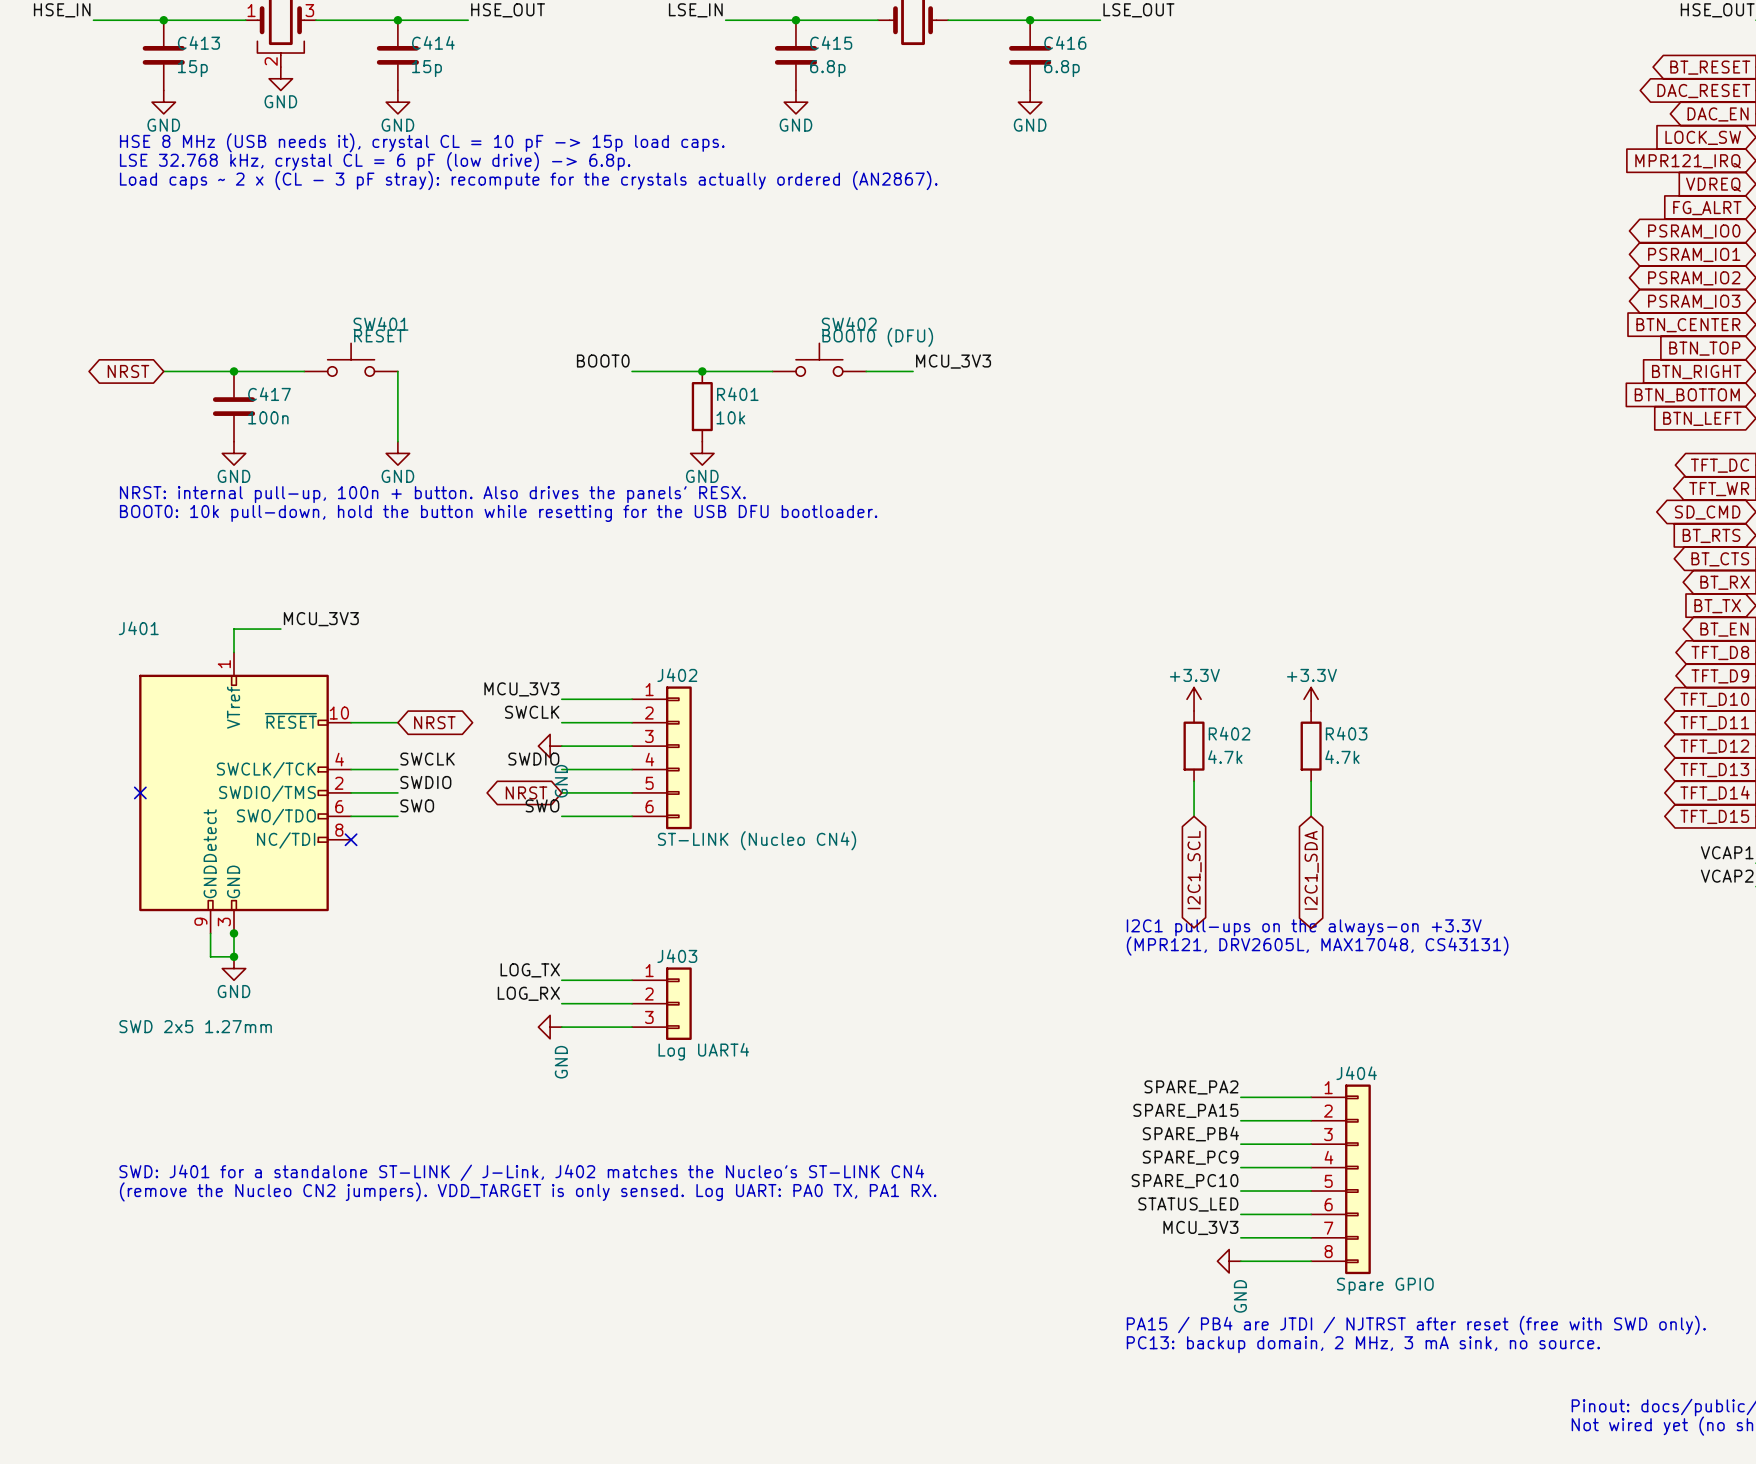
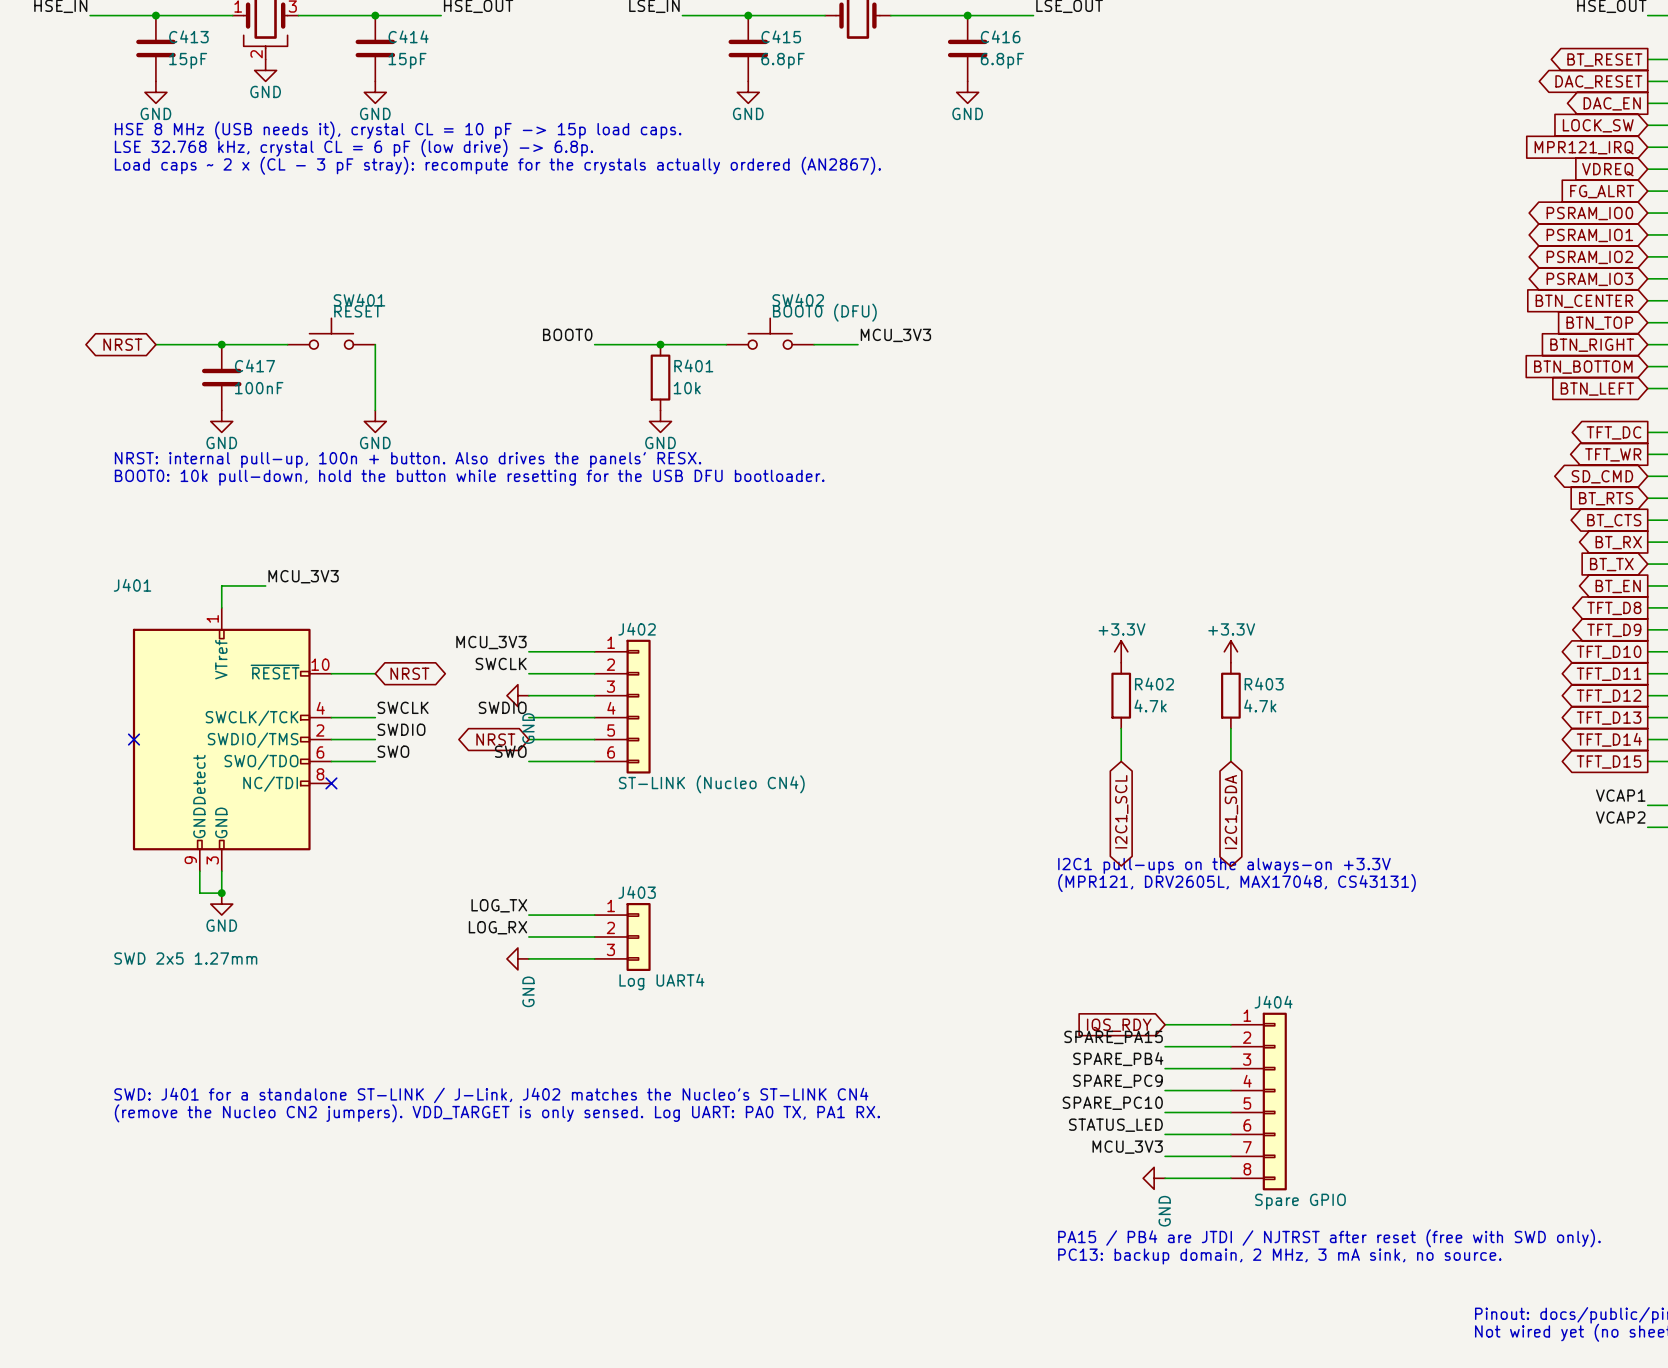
C413 value: 15p (192, 68) -> 15pF (188, 60)
C414 value: 15p (426, 68) -> 15pF (407, 60)
C415 value: 6.8p (827, 68) -> 6.8pF (783, 60)
C416 value: 6.8p (1061, 68) -> 6.8pF (1002, 60)
C417 value: 100n (268, 417) -> 100nF (259, 388)
junction: (234, 933) -> none
label: SPARE_PA2 (1191, 1087) -> none
global label: none -> IQS_RDY (1119, 1025)

